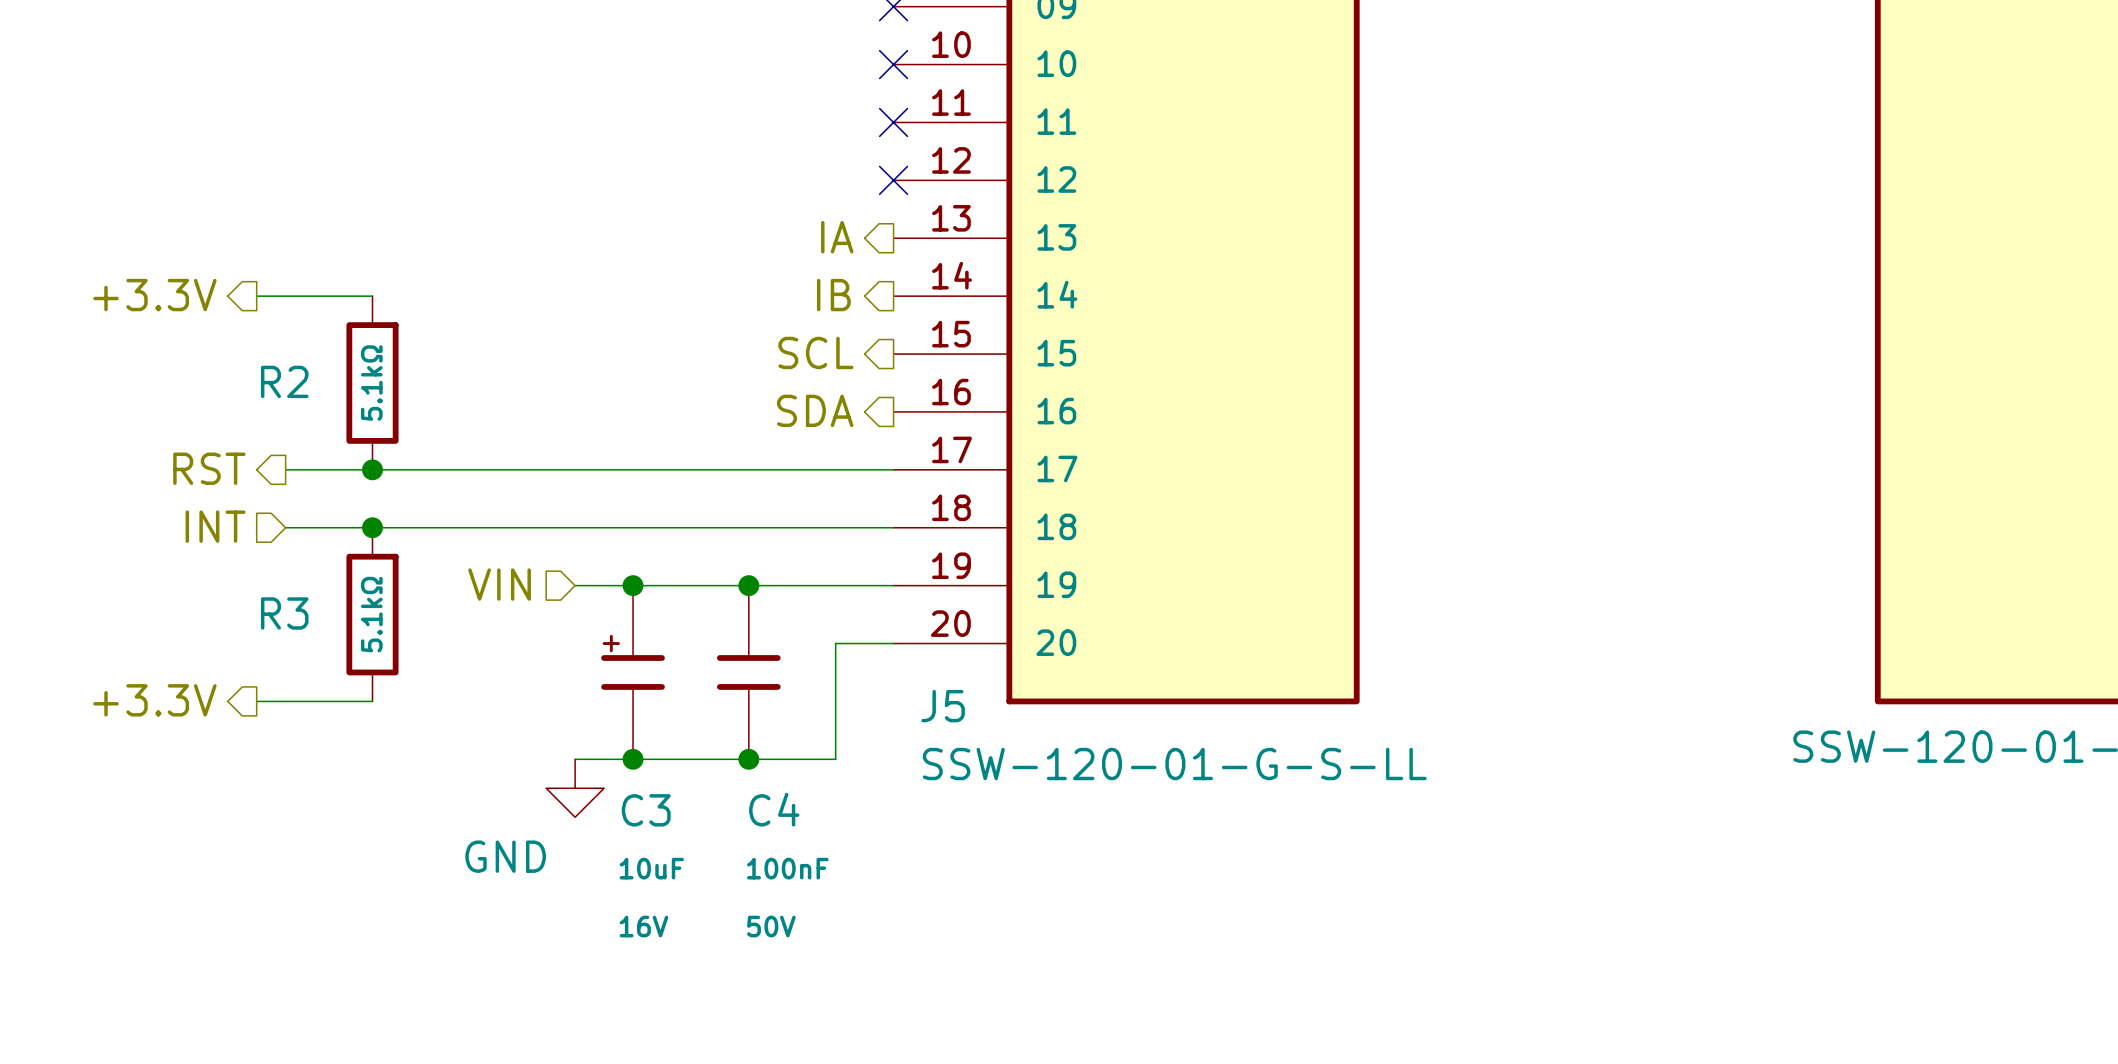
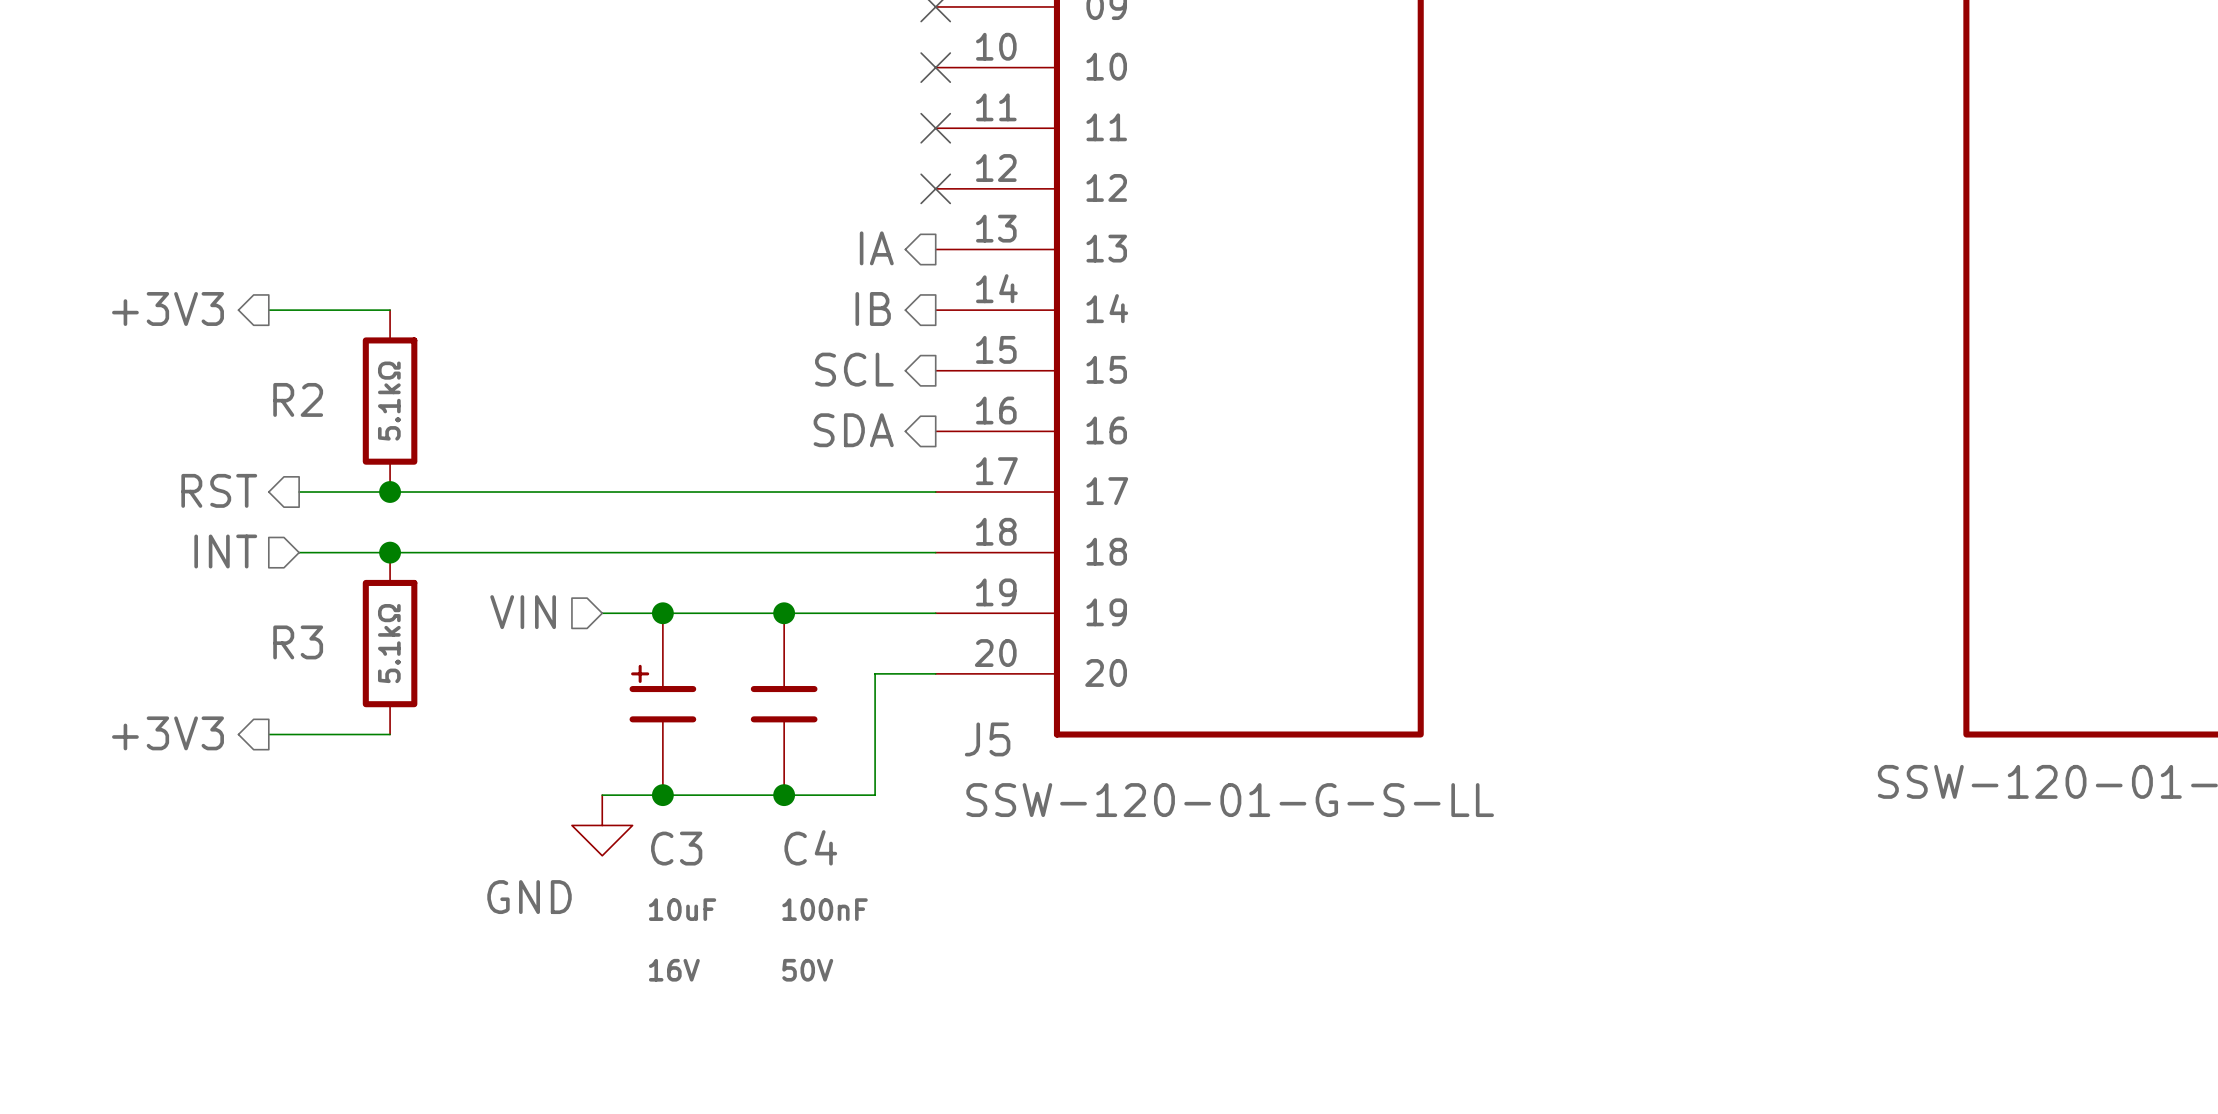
hierarchical label: +3.3V (154, 295) -> +3V3 (168, 308)
hierarchical label: +3.3V (154, 700) -> +3V3 (168, 733)

